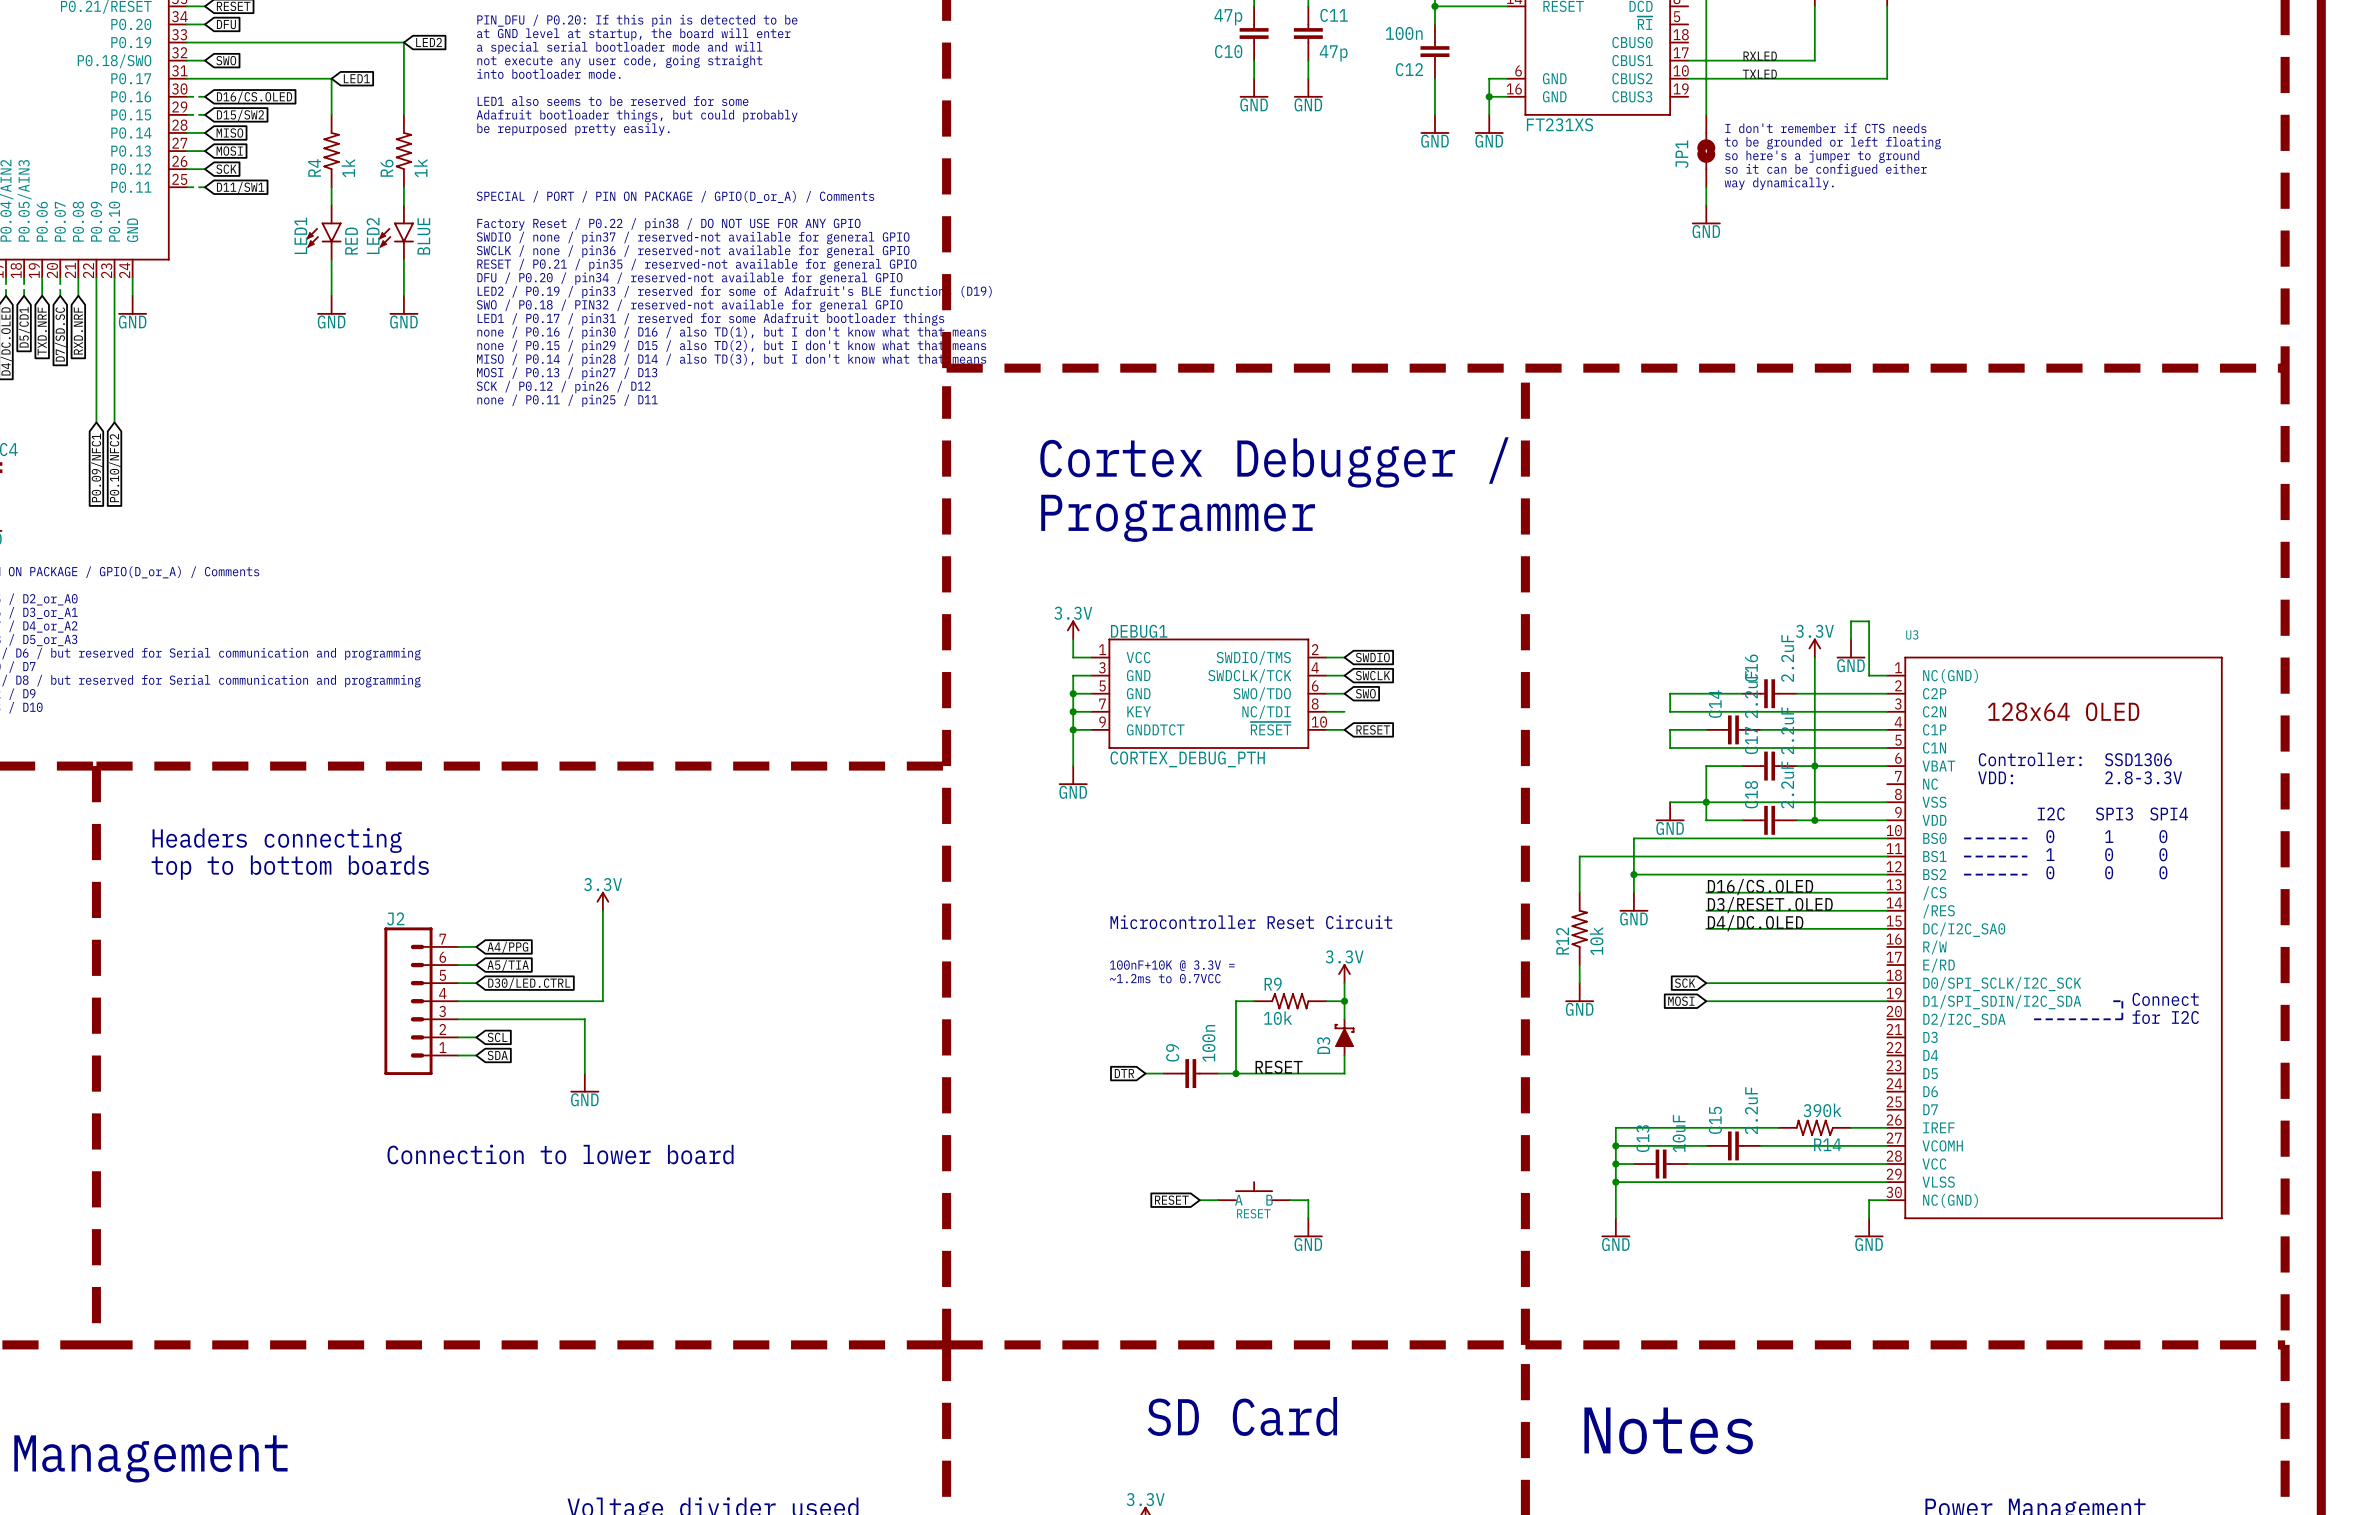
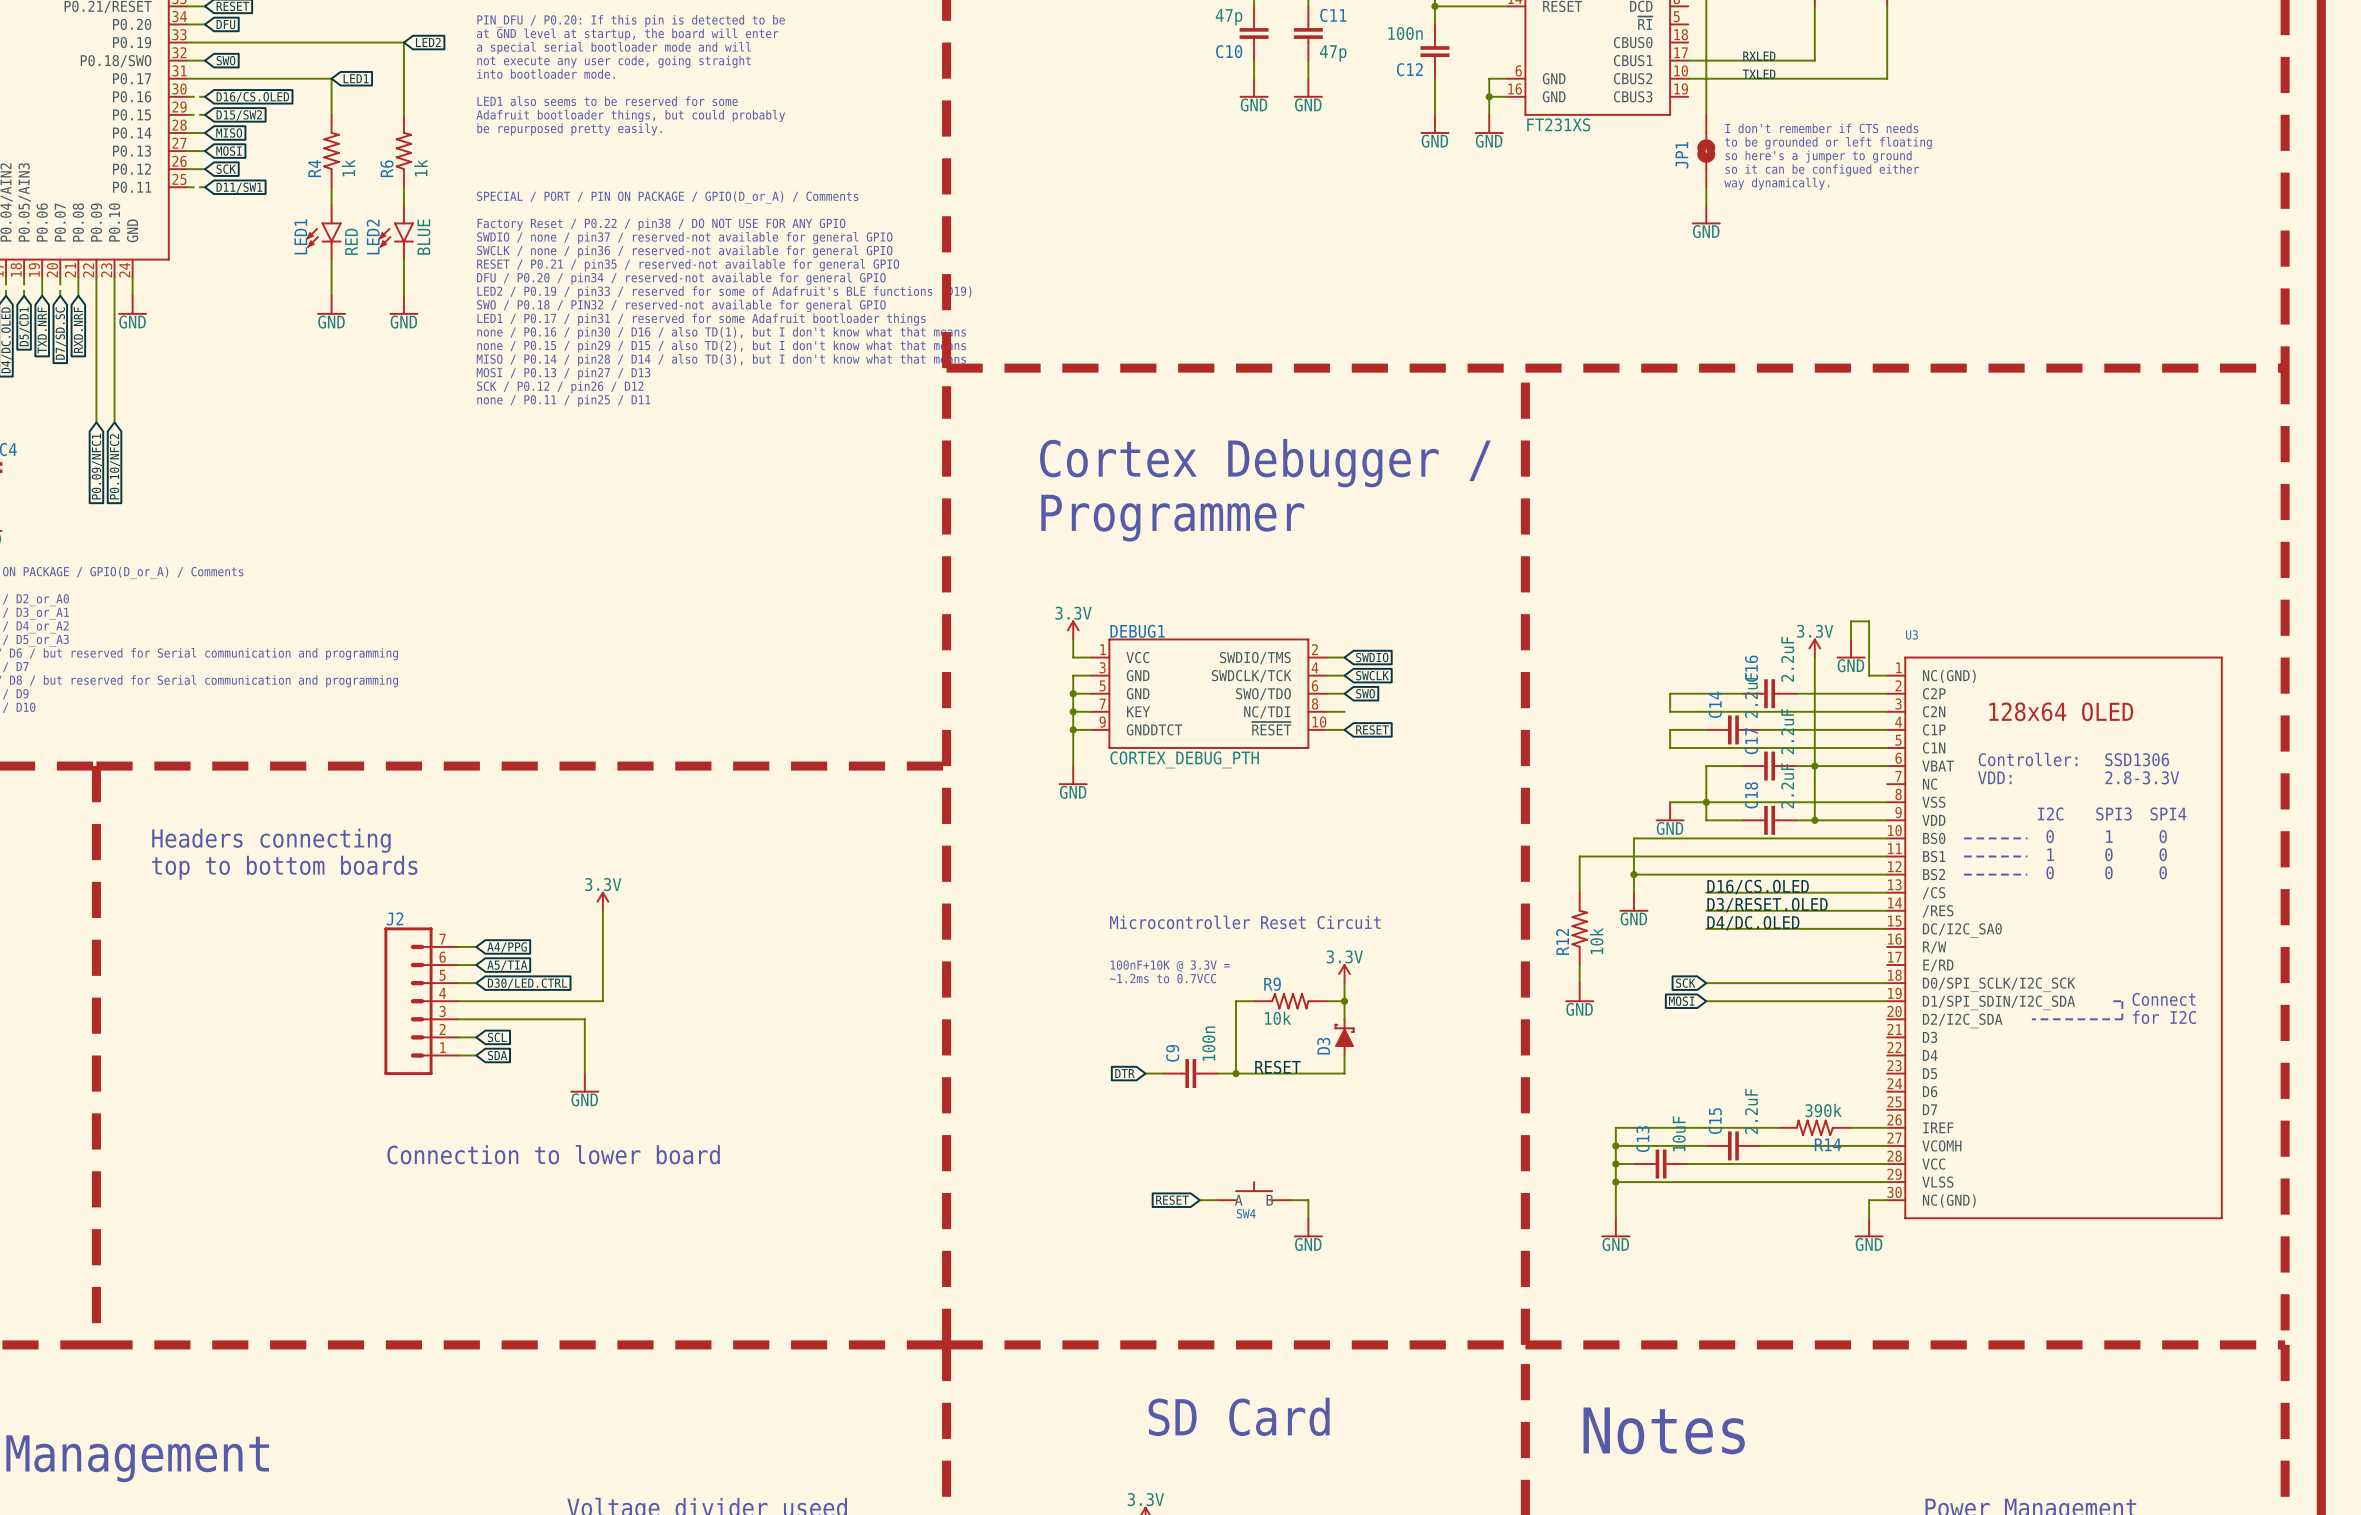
RESET name: RESET (1253, 1213) -> SW4 (1246, 1213)

